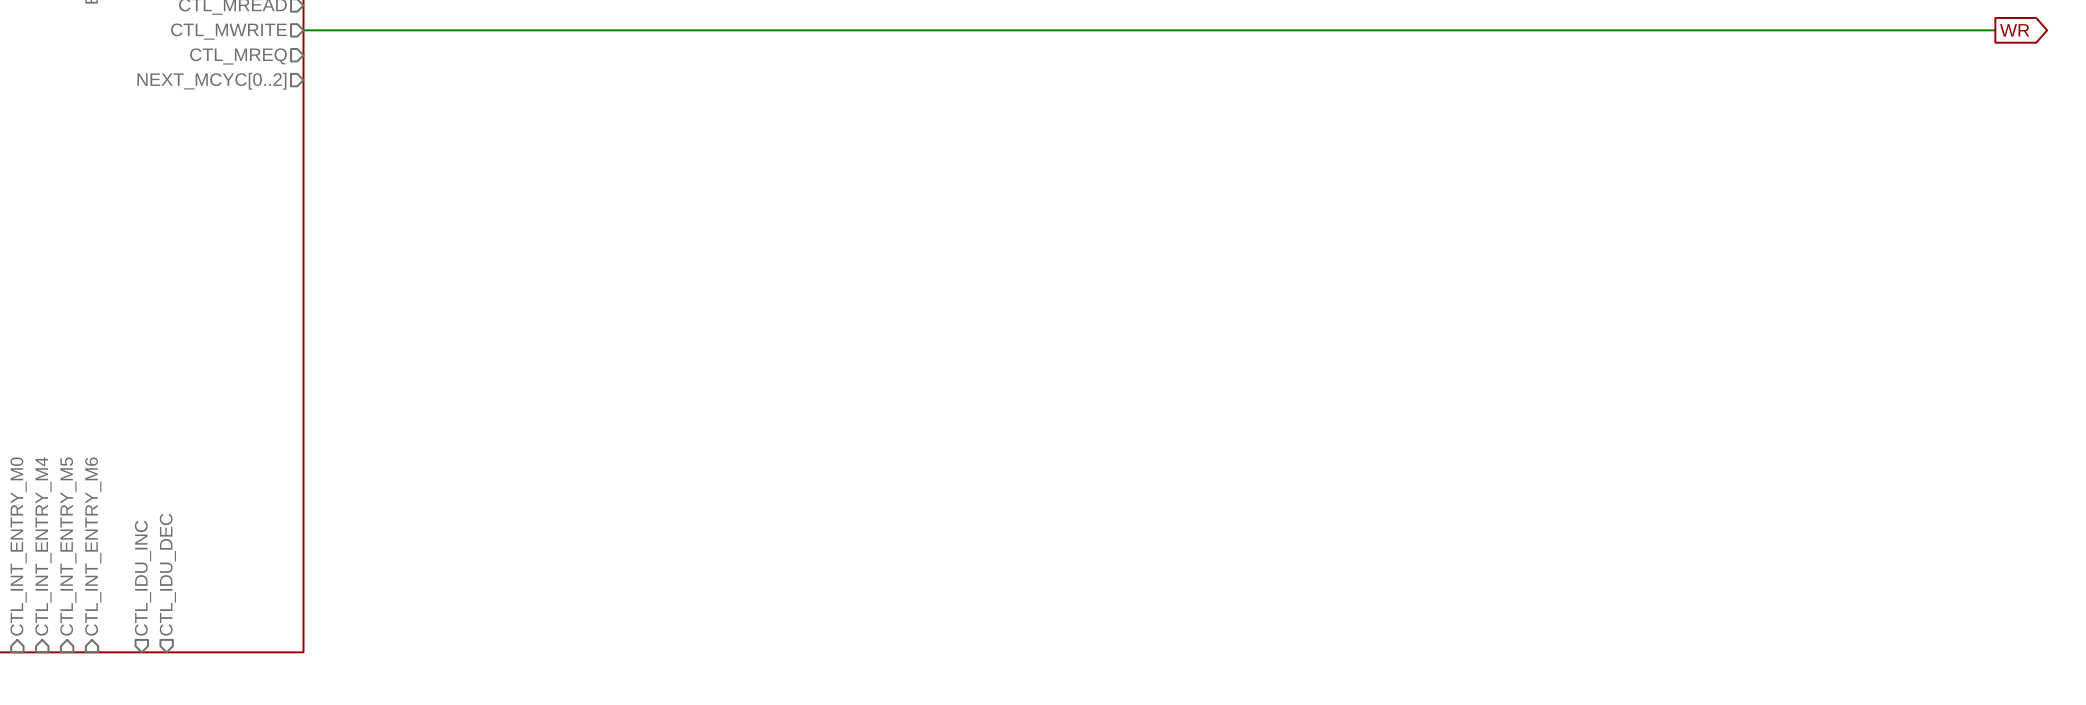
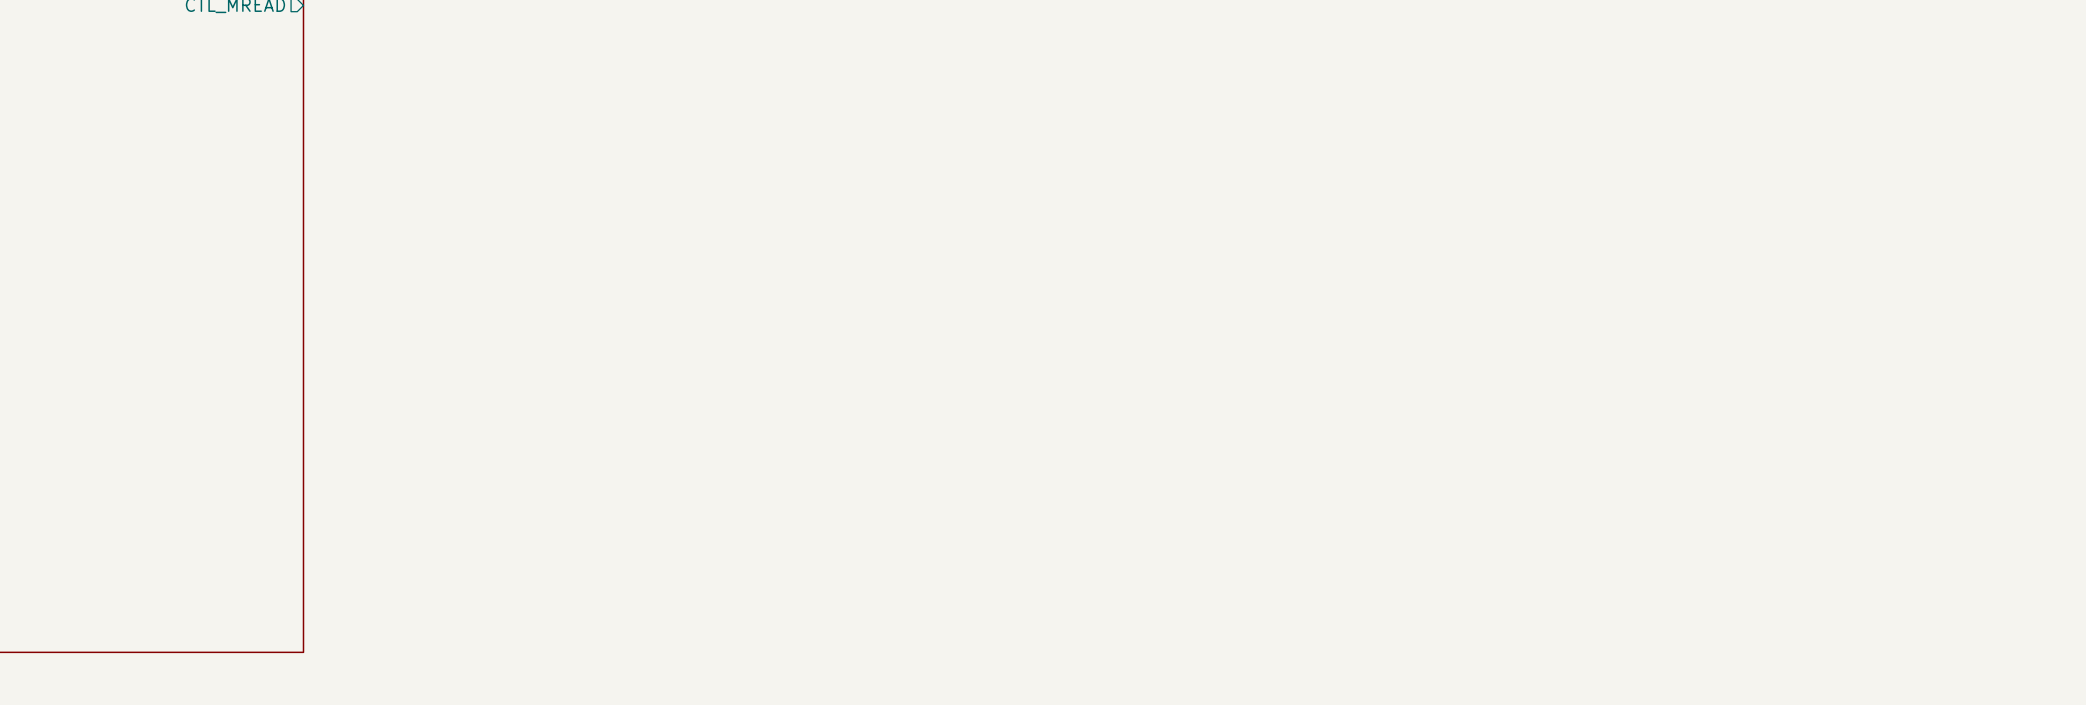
wire: (303, 30) (1995, 30) -> none
global label: WR (2014, 30) -> none
sheet pin: CTL_MWRITE (228, 31) -> none
sheet pin: CTL_MREQ (238, 56) -> none
sheet pin: NEXT_MCYC[0..2] (211, 81) -> none
sheet pin: CTL_INT_ENTRY_M0 (18, 546) -> none
sheet pin: CTL_INT_ENTRY_M4 (43, 546) -> none
sheet pin: CTL_INT_ENTRY_M5 (68, 546) -> none
sheet pin: CTL_INT_ENTRY_M6 (93, 546) -> none
sheet pin: CTL_IDU_DEC (167, 574) -> none
sheet pin: CTL_IDU_INC (143, 578) -> none

